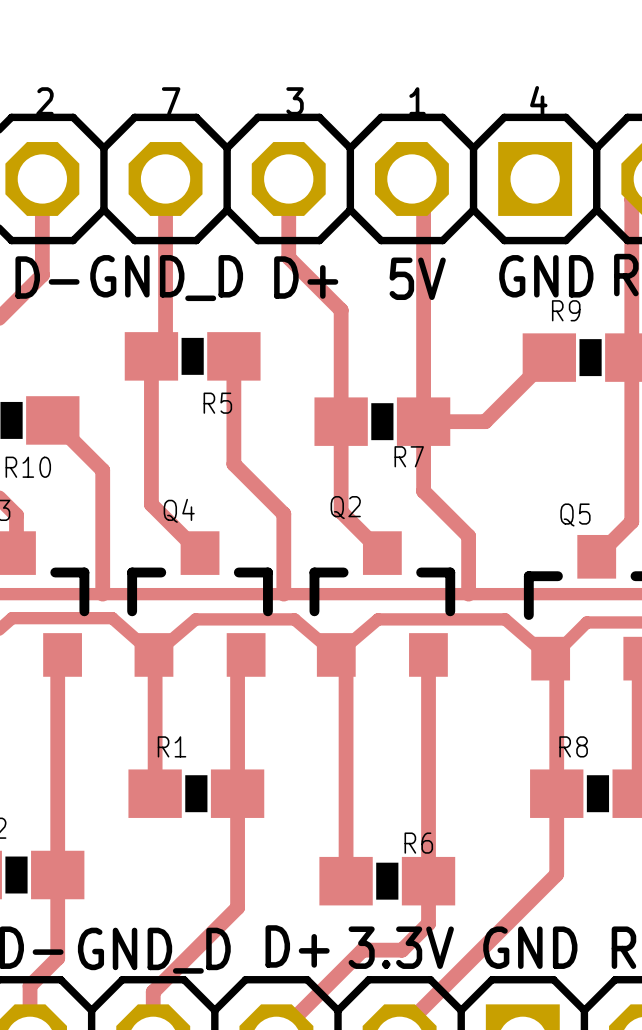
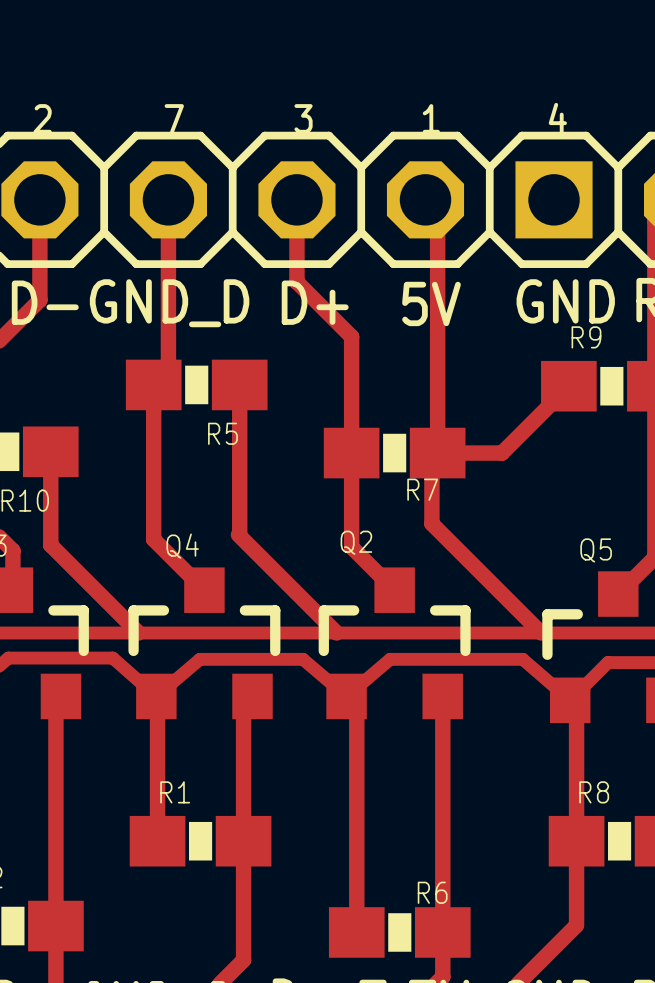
track: (52, 420) (102, 470) (102, 594) -> (50, 451) (50, 545) (138, 633)
track: (423, 421) (423, 491) (468, 536) (468, 594) -> none
track: none -> (431, 458) (431, 523) (541, 633)
track: (233, 464) (283, 514) (283, 594) -> (239, 497) (238, 534) (336, 633)

